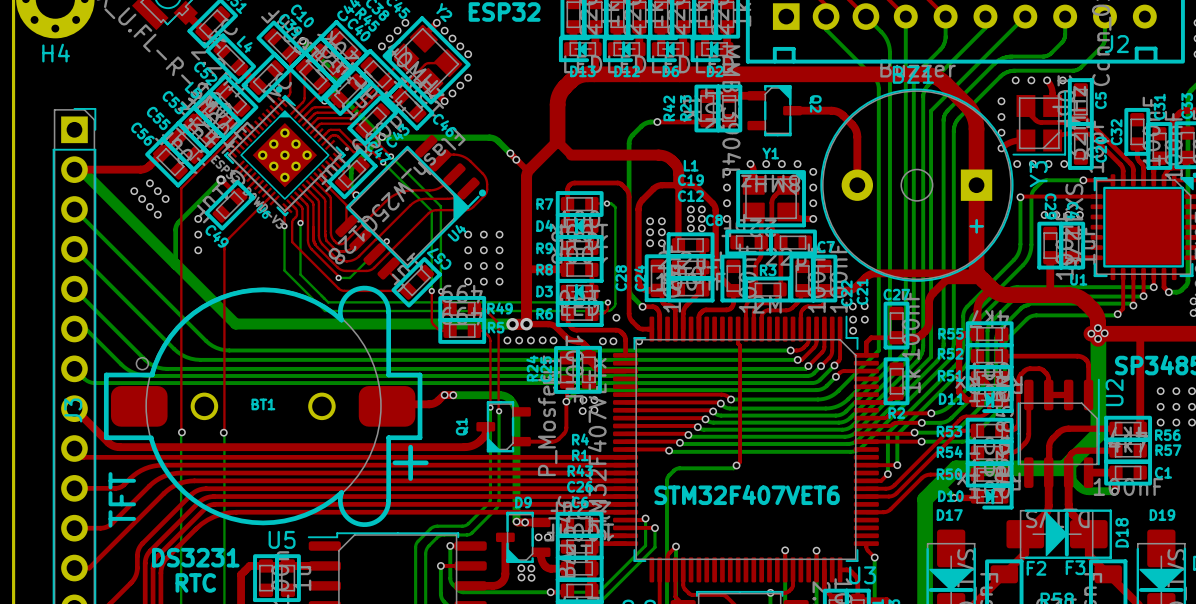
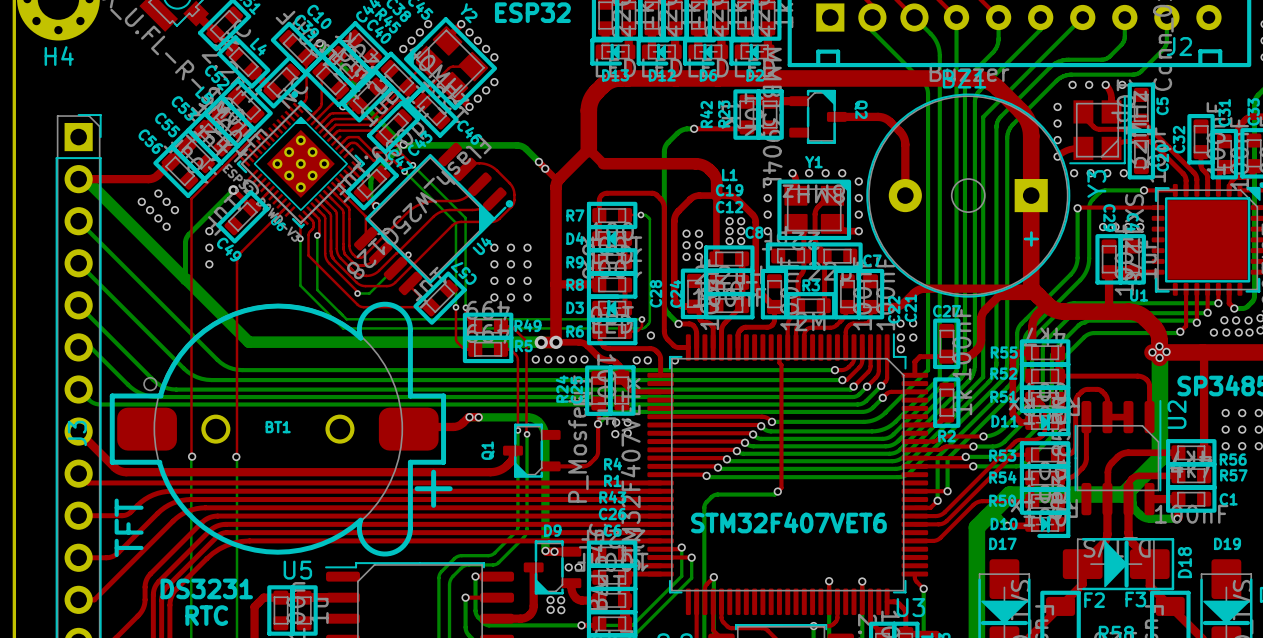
via: none -> (1224, 320)
via: none -> (1236, 320)
via: none -> (1248, 320)
via: none -> (1213, 332)
via: none -> (1226, 332)
via: none -> (1238, 332)
via: none -> (1249, 332)

